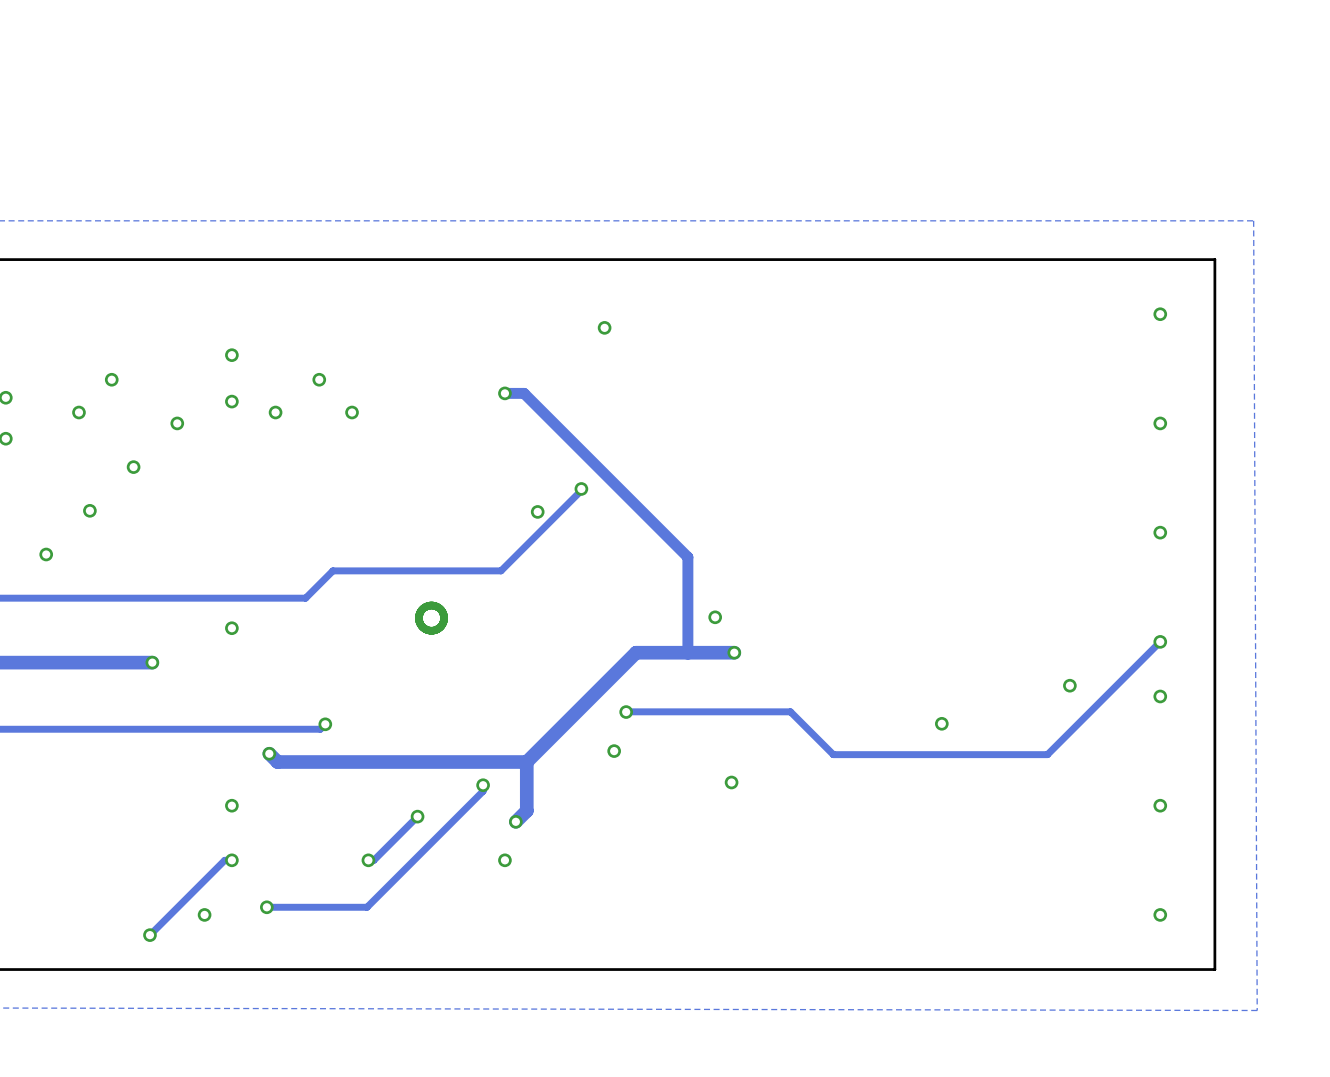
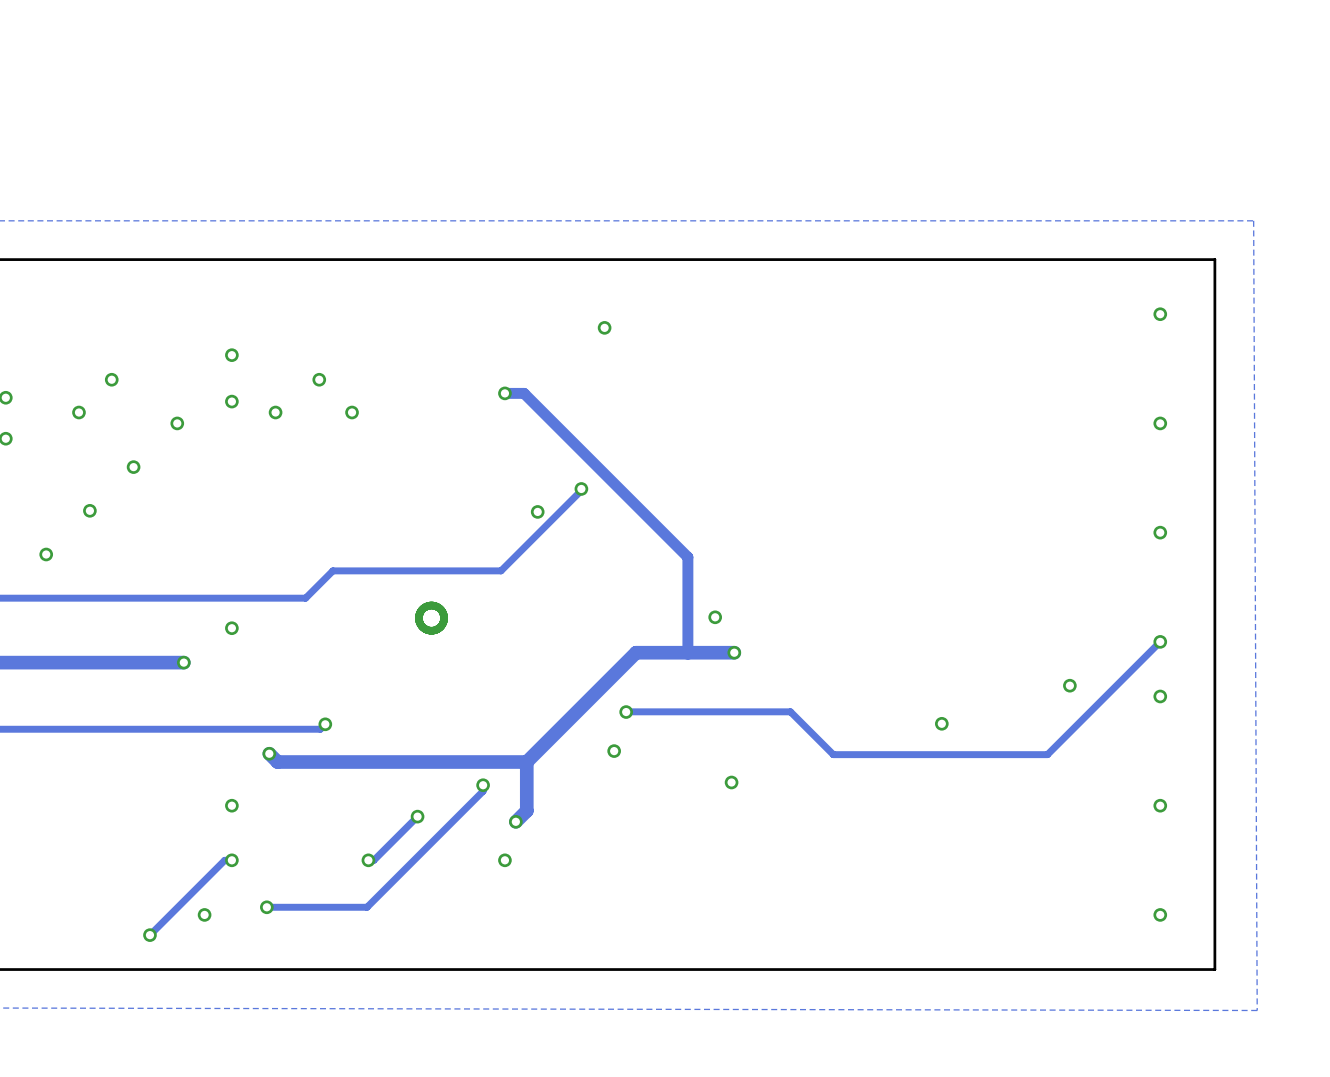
via position: (152, 662) -> (183, 662)
track: none -> (183, 662) (152, 662)

